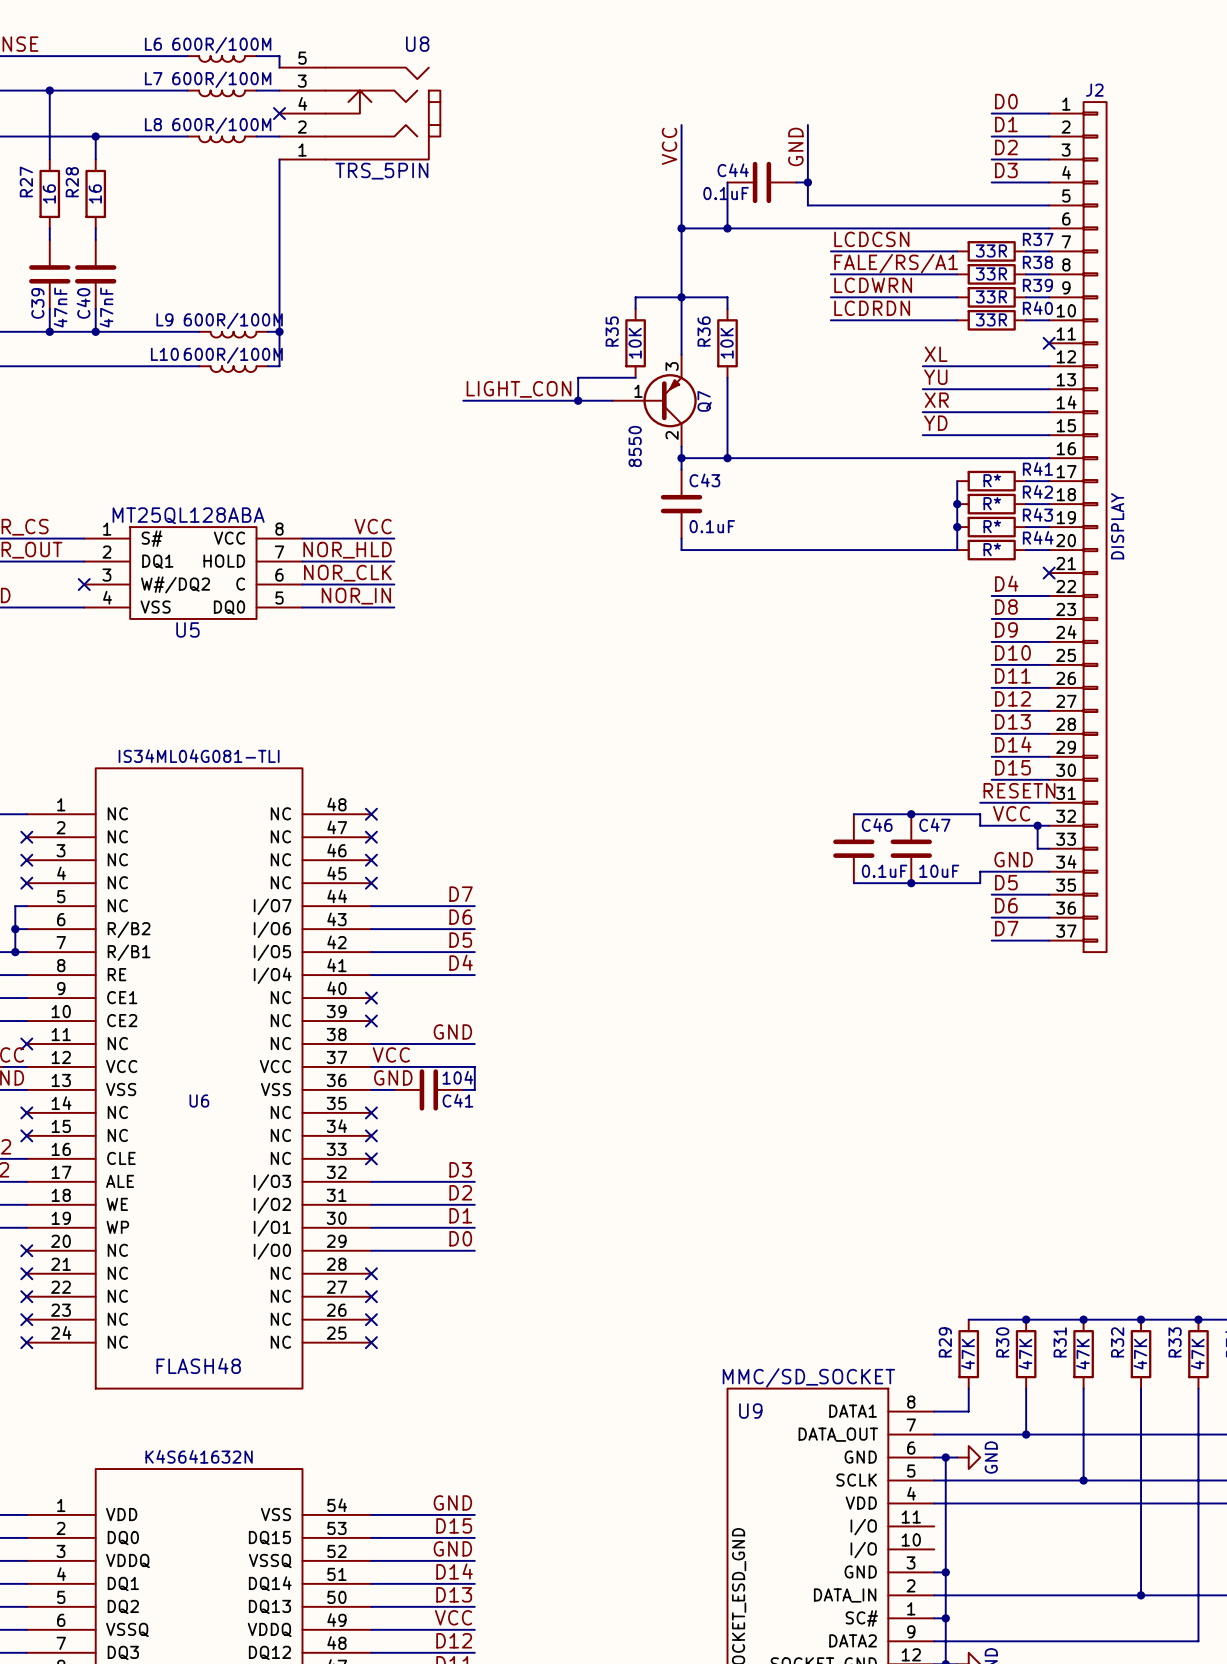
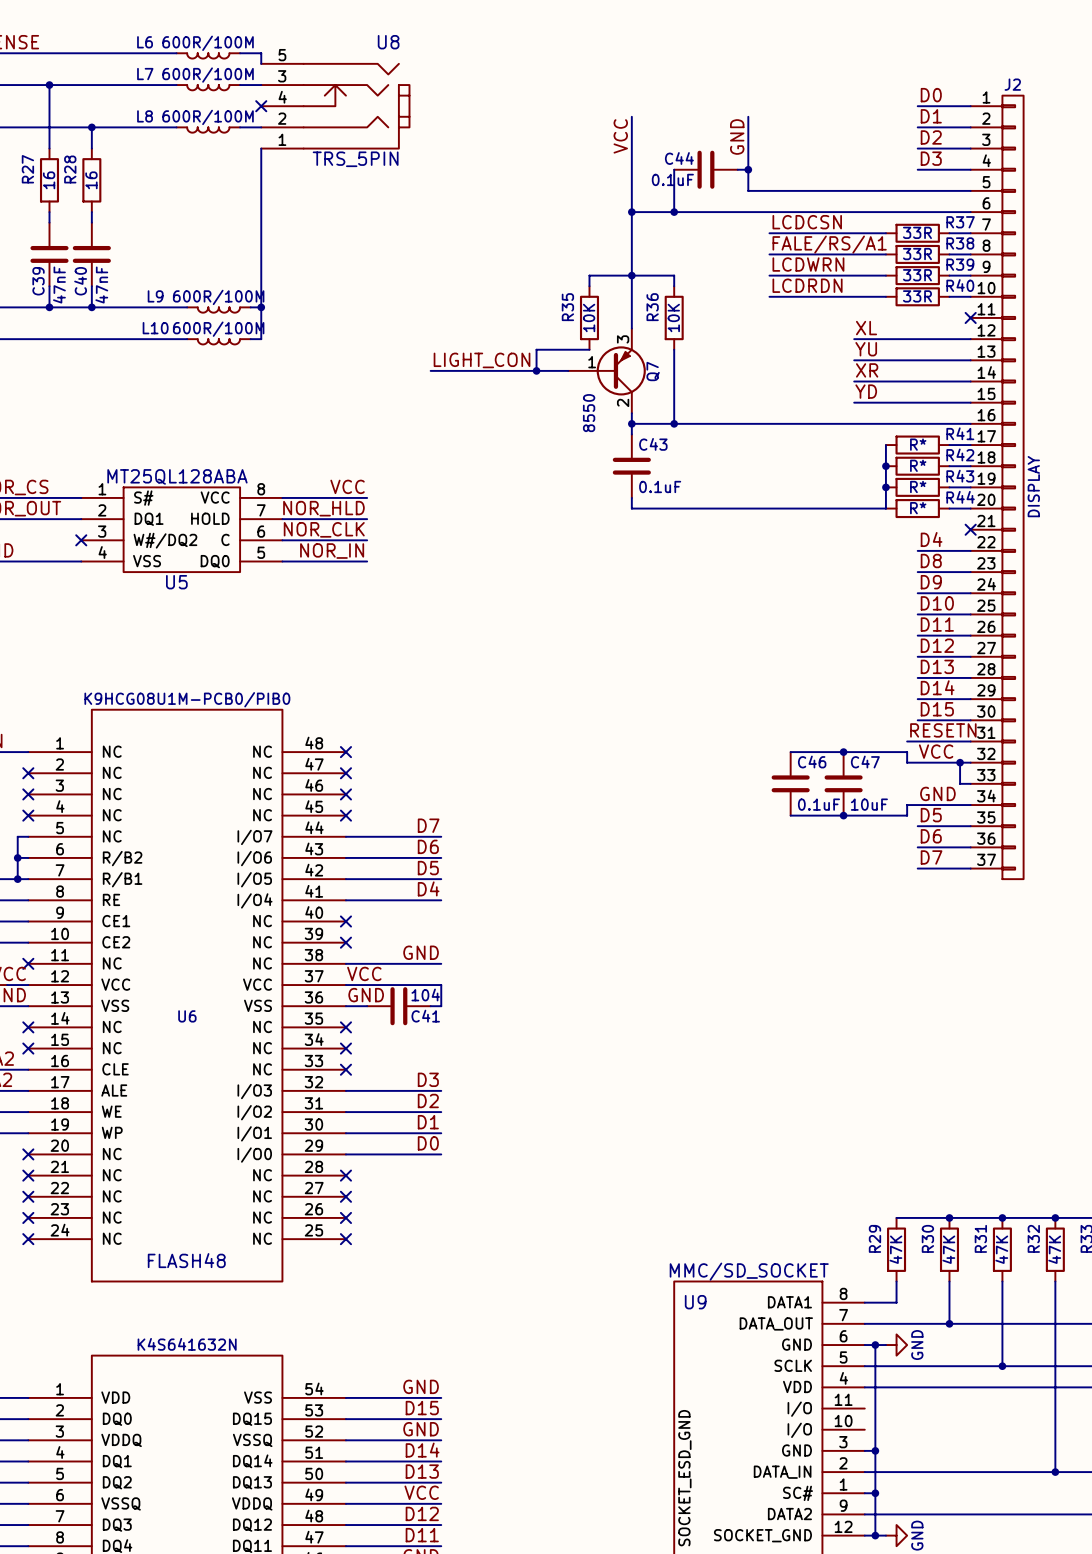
U6 value: IS34ML04G081-TLI (199, 756) -> K9HCG08U1M-PCB0/PIB0 (187, 699)

